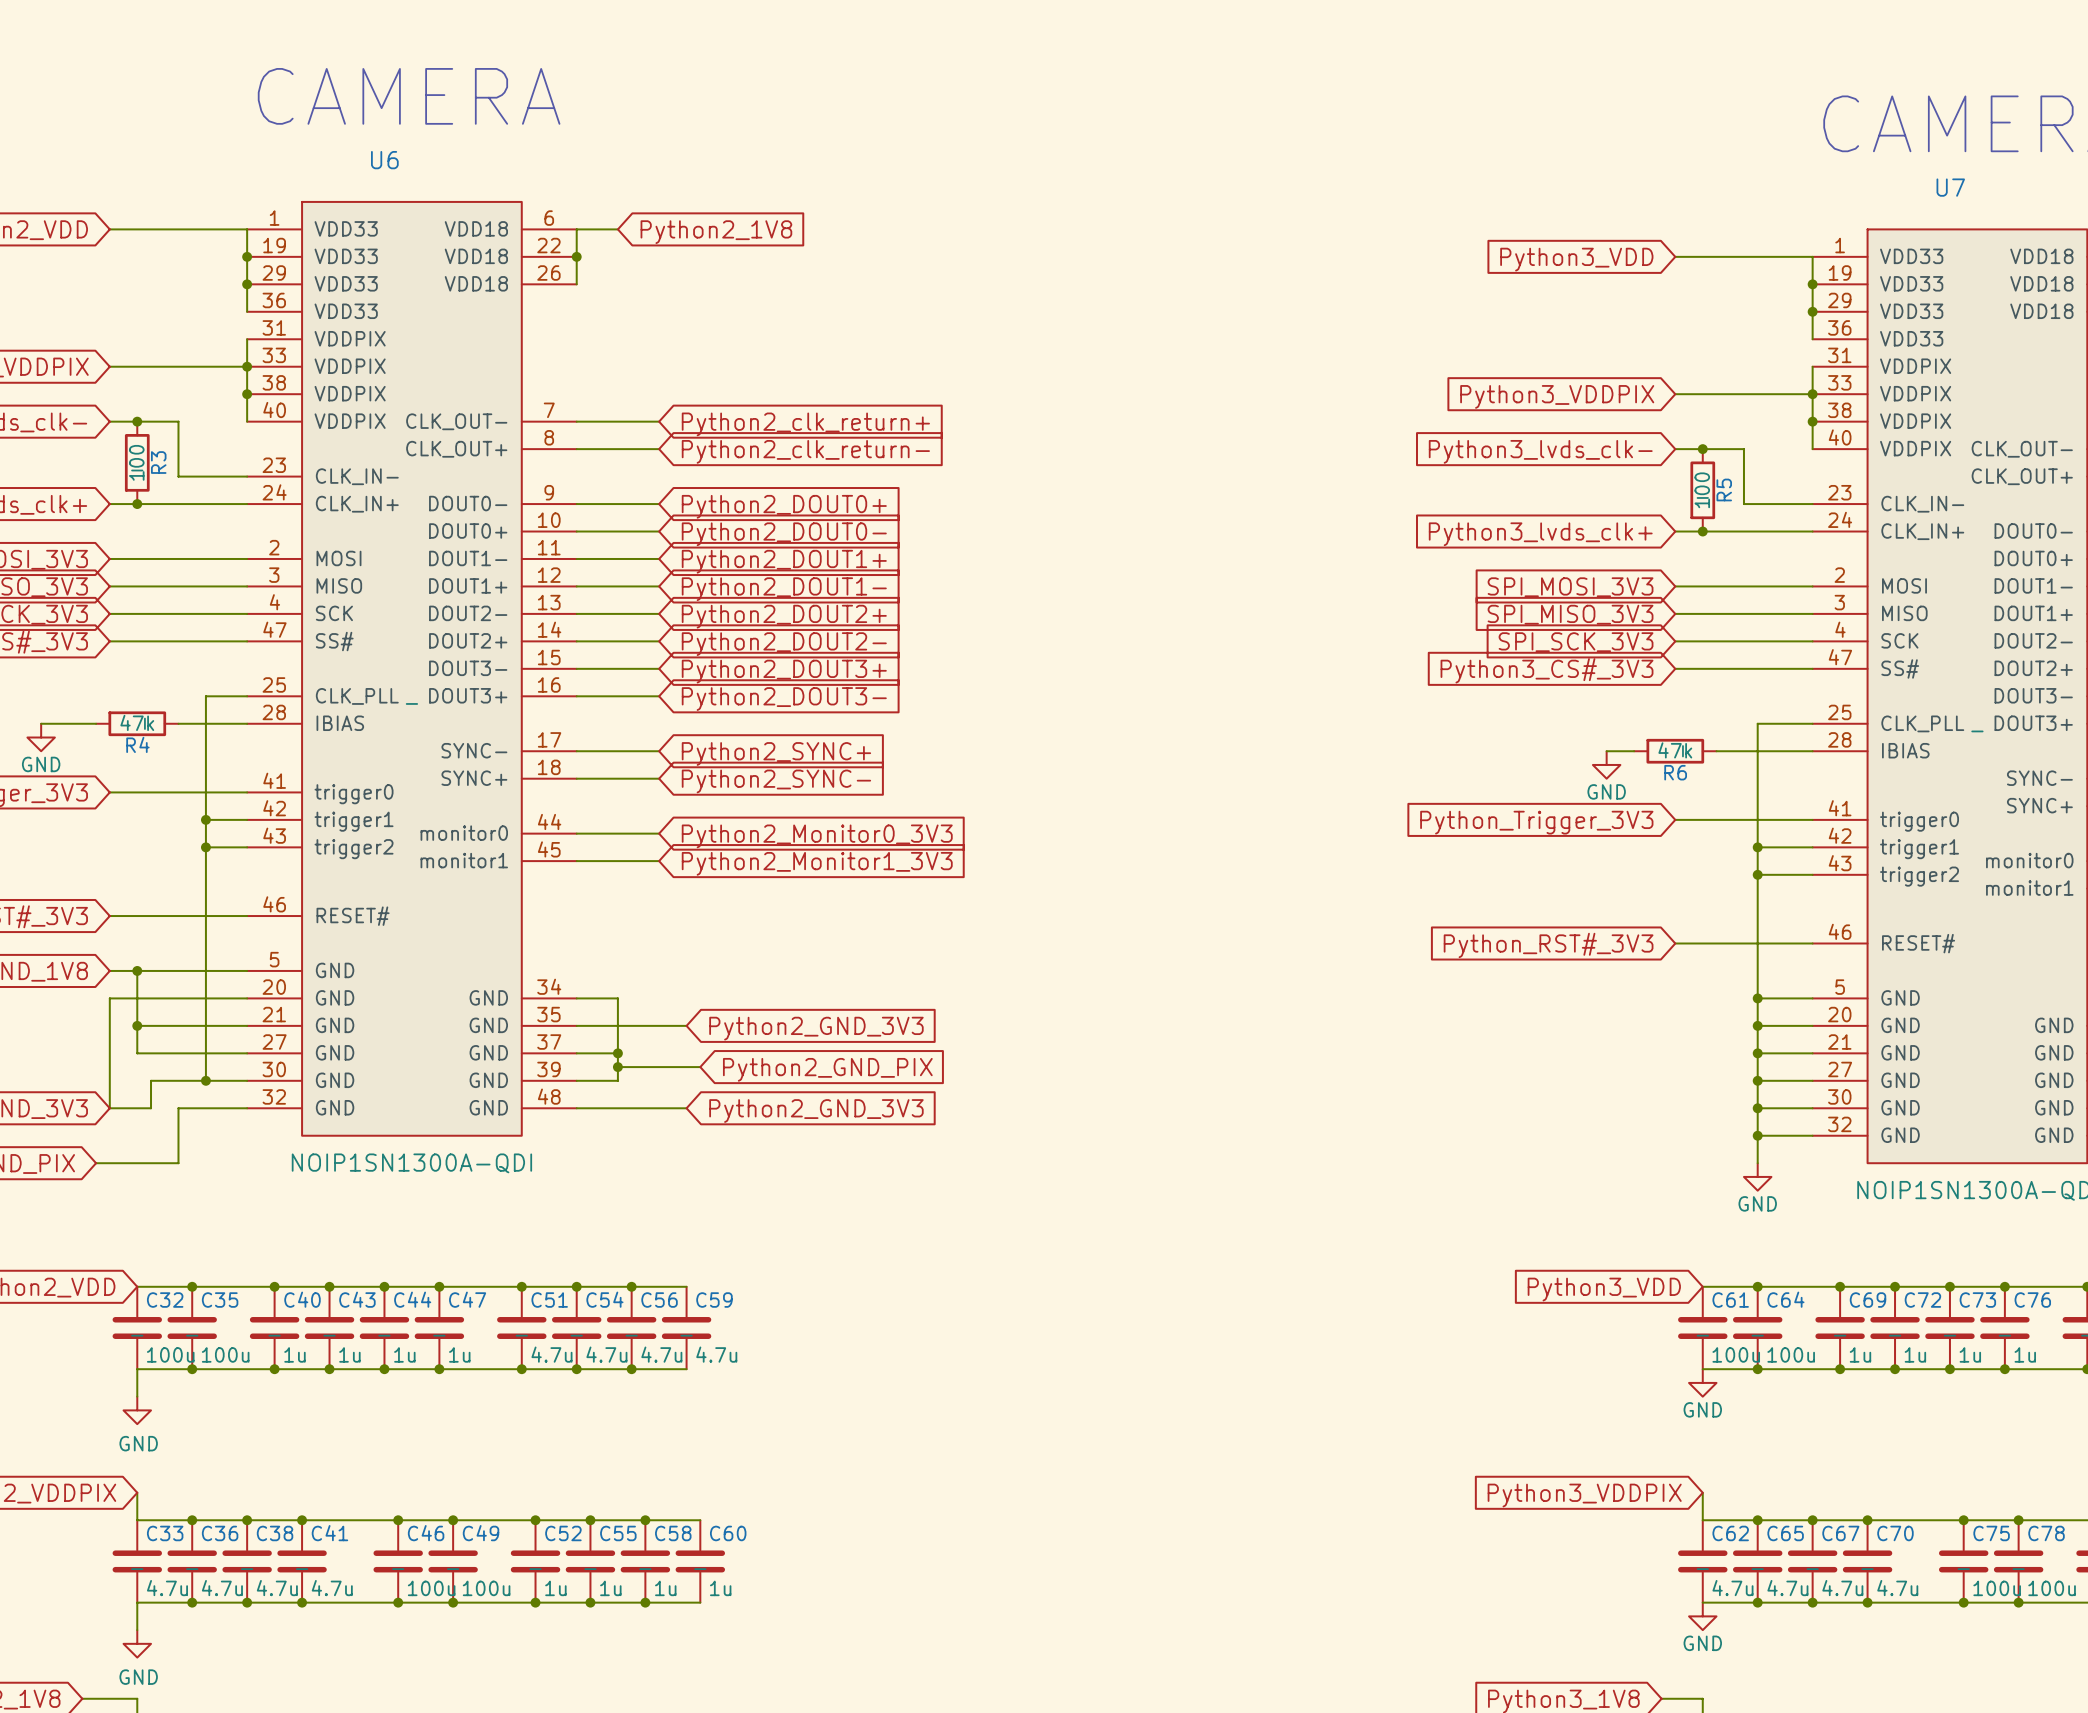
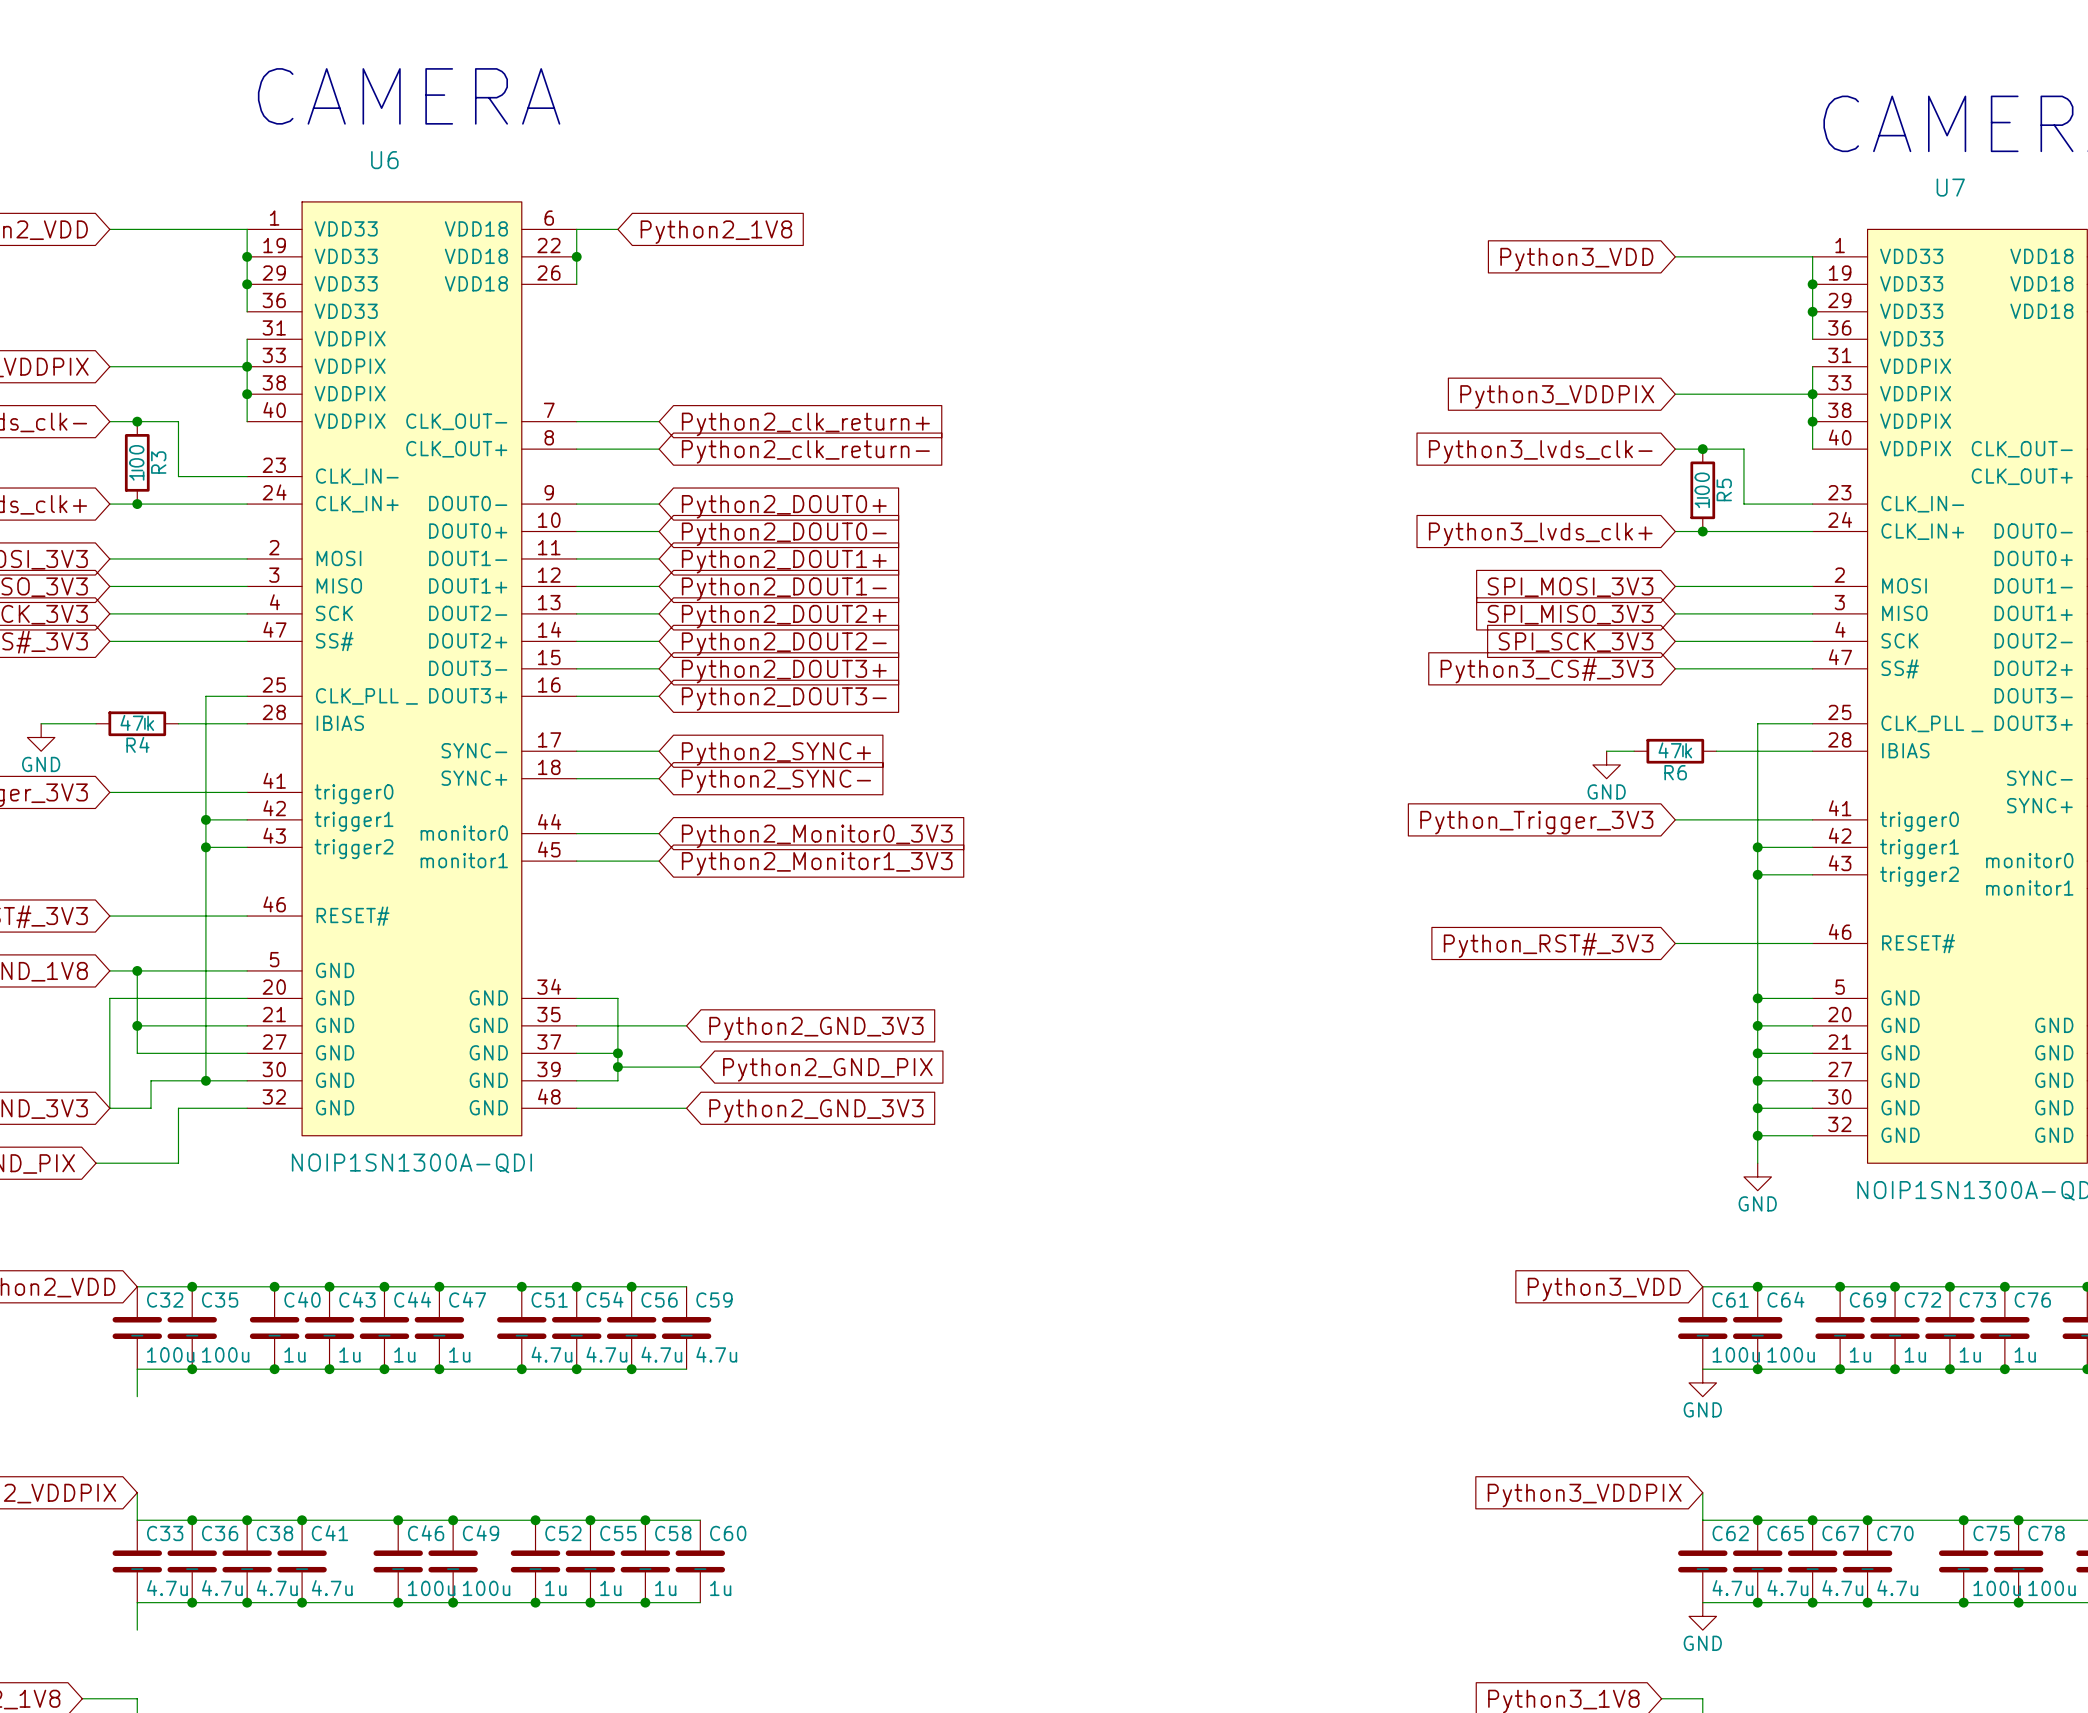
power symbol: GND (137, 1410) -> none
power symbol: GND (137, 1643) -> none

